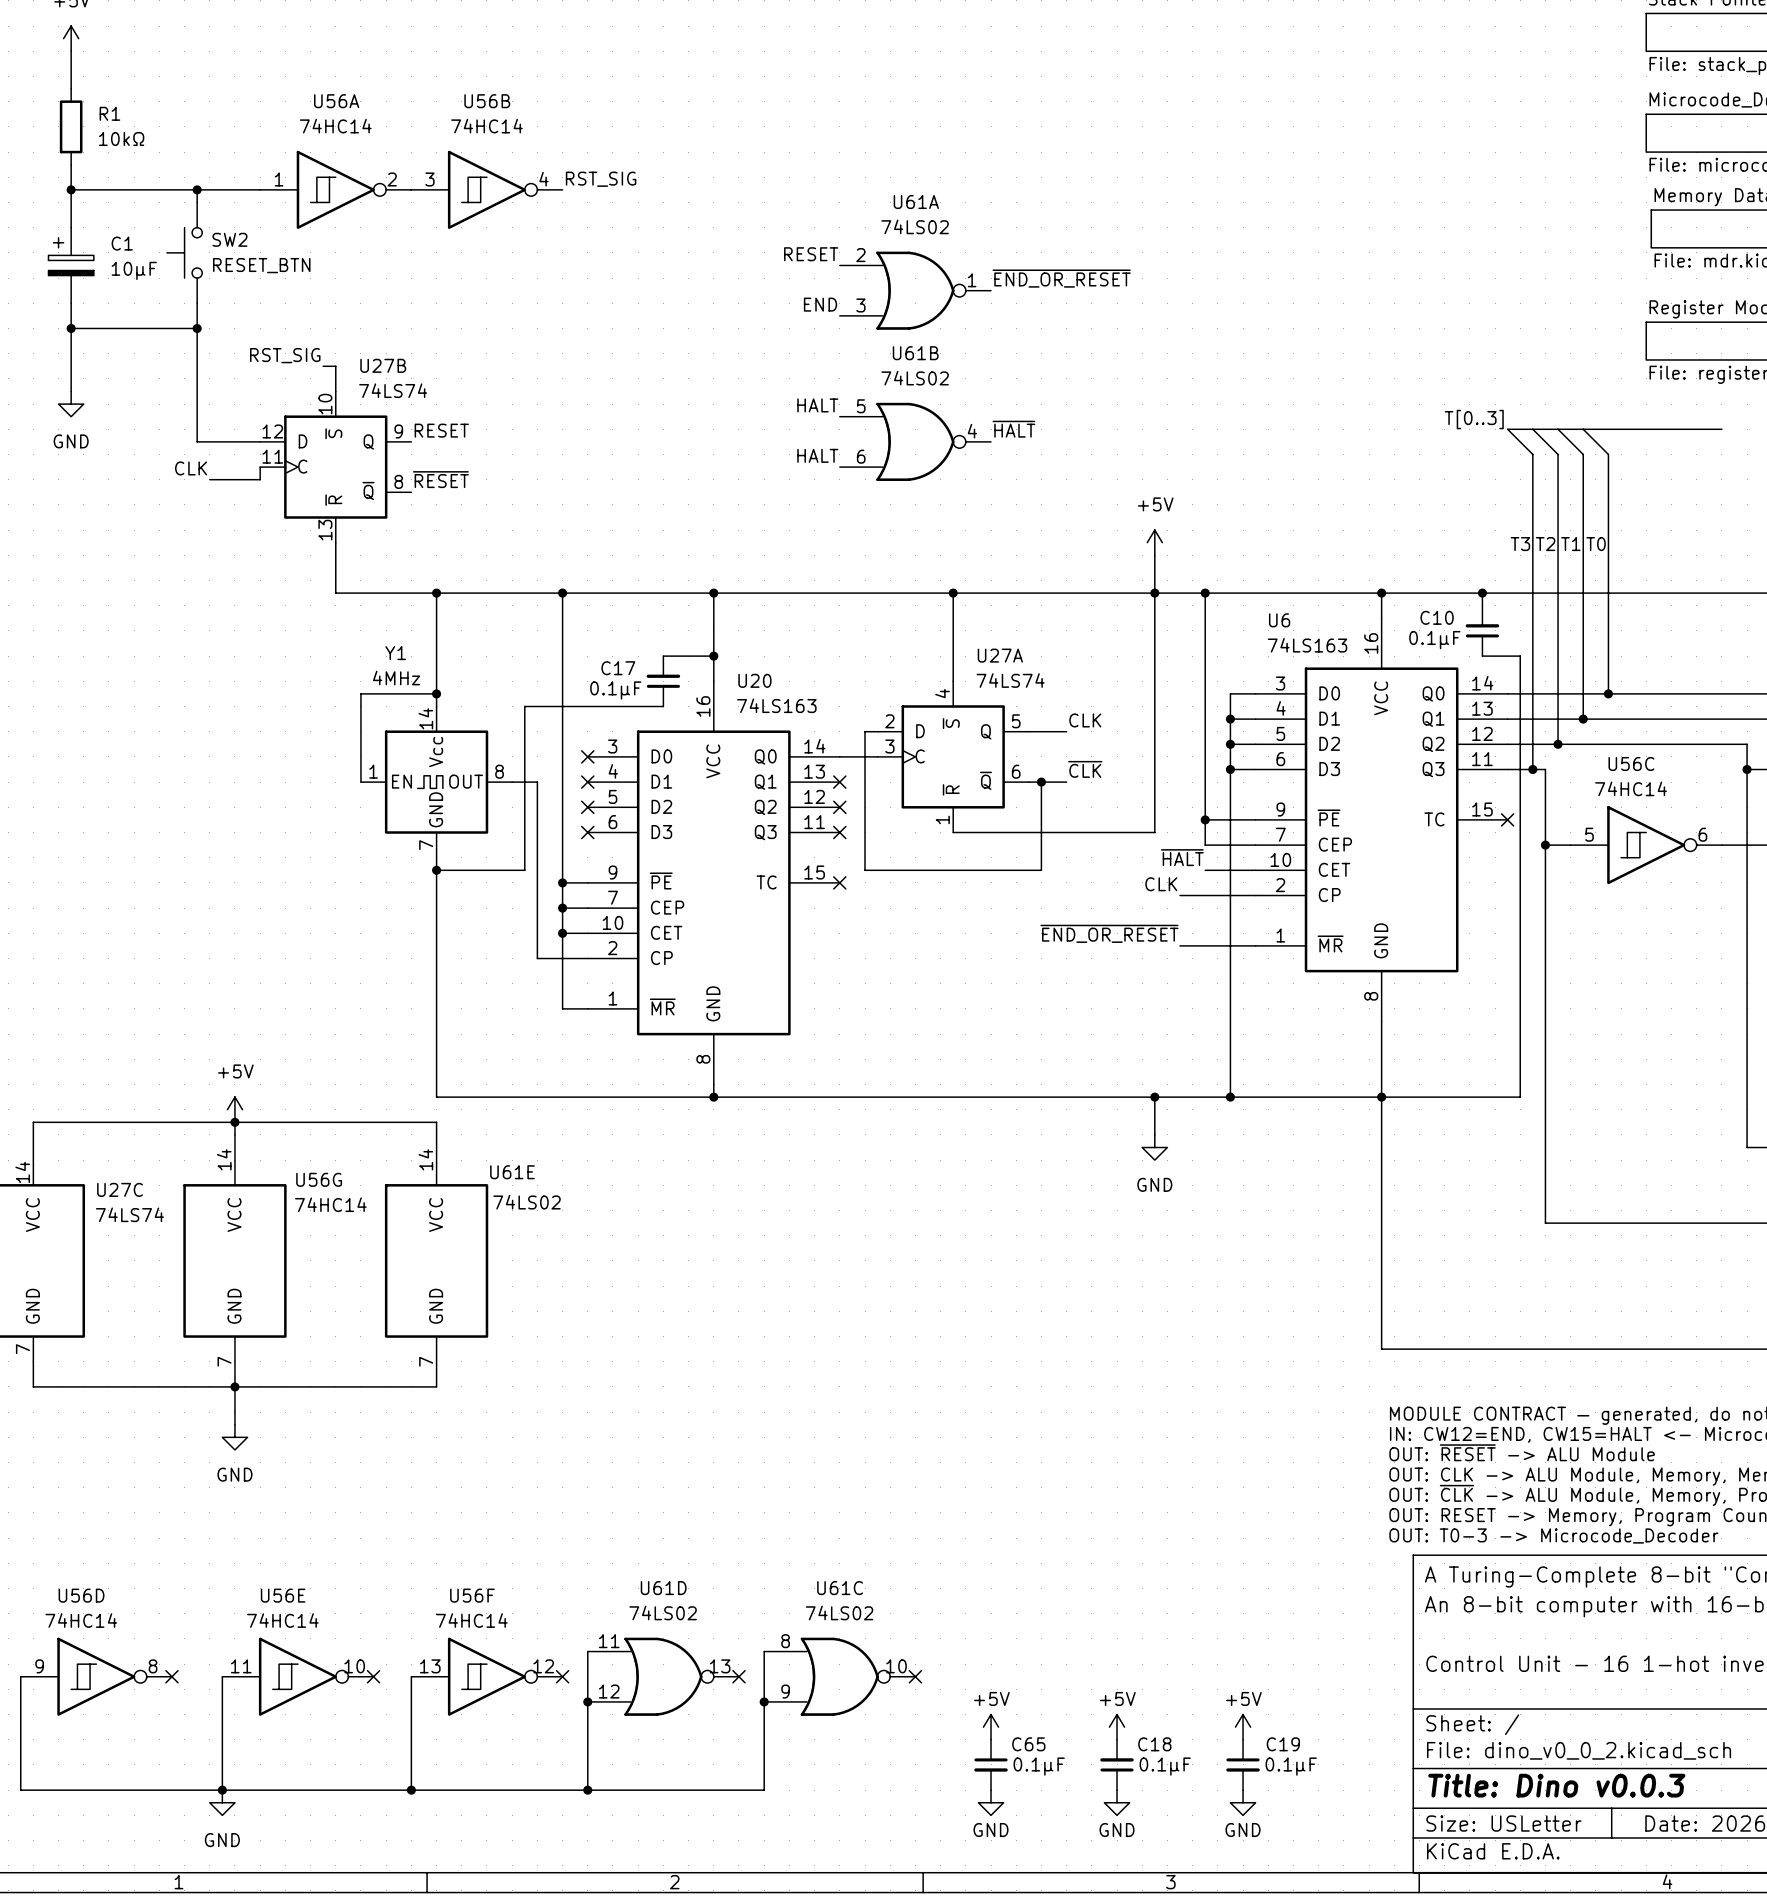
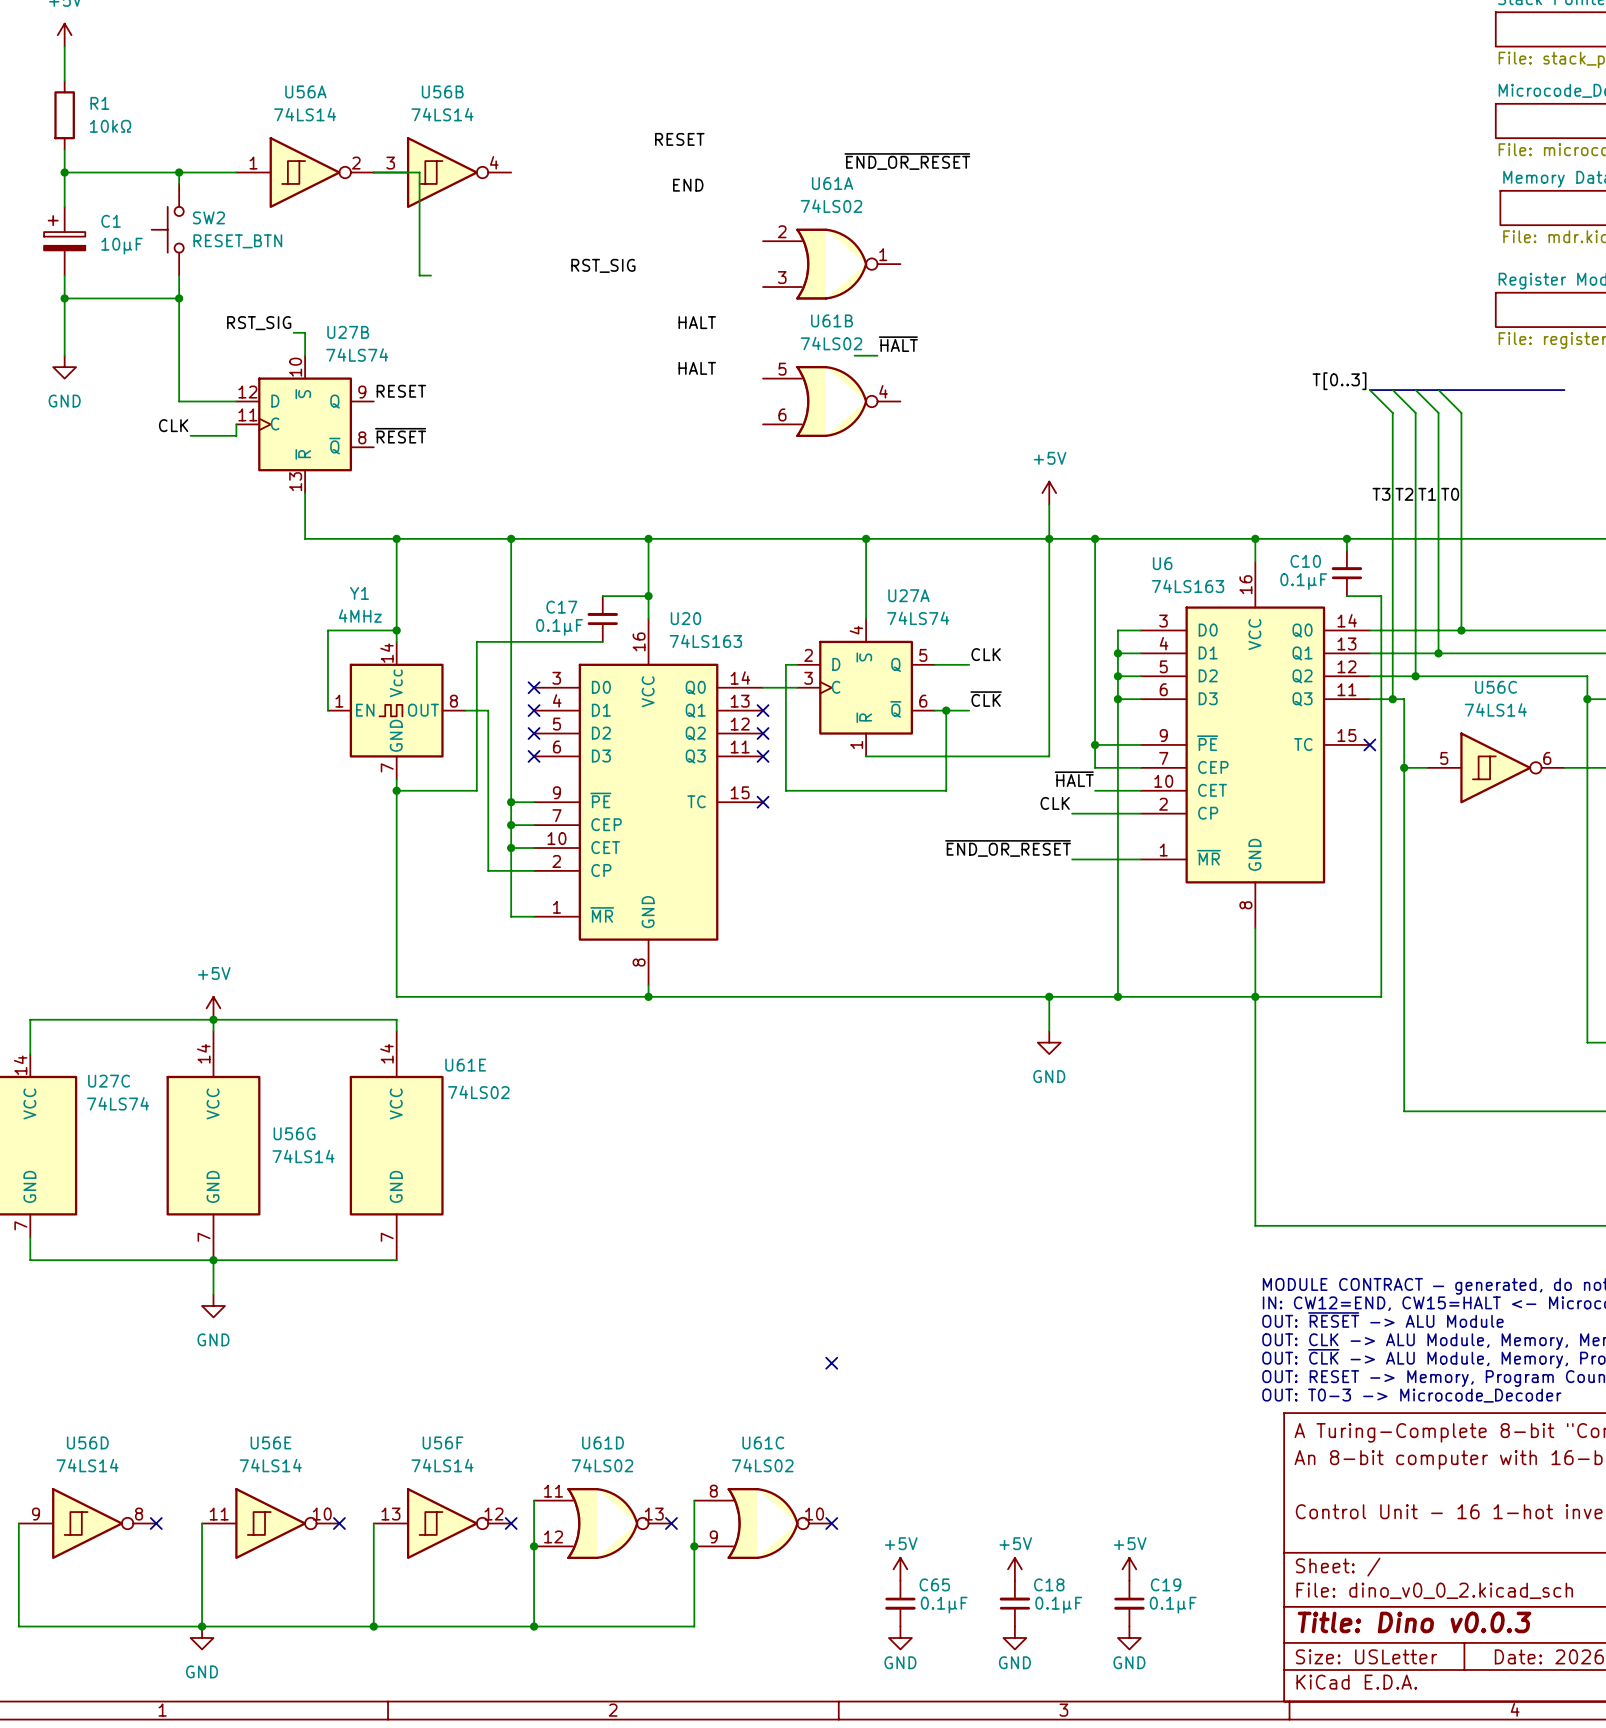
U56A value: 74HC14 (335, 126) -> 74LS14 (305, 114)
U56B value: 74HC14 (486, 126) -> 74LS14 (442, 114)
label position: RST_SIG (601, 179) -> RST_SIG (603, 265)
wire: none -> (373, 172) (419, 172) (419, 275) (431, 275)
label position: RESET (811, 254) -> RESET (679, 139)
label position: ~{END_OR_RESET} (1061, 278) -> ~{END_OR_RESET} (907, 161)
label position: END (820, 304) -> END (688, 185)
label: none -> HALT (697, 322)
wire: none -> (854, 355) (877, 355)
label position: HALT (817, 405) -> HALT (697, 368)
label position: ~{HALT} (1013, 429) -> ~{HALT} (898, 344)
label: HALT (817, 455) -> none
U56C name position: U56C (1631, 763) -> U56C (1496, 687)
U56C value: 74HC14 (1631, 788) -> 74LS14 (1495, 709)
U56G name position: U56G (319, 1179) -> U56G (294, 1133)
U56G value: 74HC14 (330, 1204) -> 74LS14 (303, 1156)
no-connect mark: none -> (831, 1363)
U56D name position: U56D (81, 1595) -> U56D (87, 1442)
U56E name position: U56E (283, 1595) -> U56E (271, 1442)
U56F name position: U56F (472, 1595) -> U56F (443, 1442)
U56D value: 74HC14 (81, 1620) -> 74LS14 (87, 1465)
U56E value: 74HC14 (282, 1620) -> 74LS14 (270, 1465)
U56F value: 74HC14 (471, 1620) -> 74LS14 (442, 1465)

